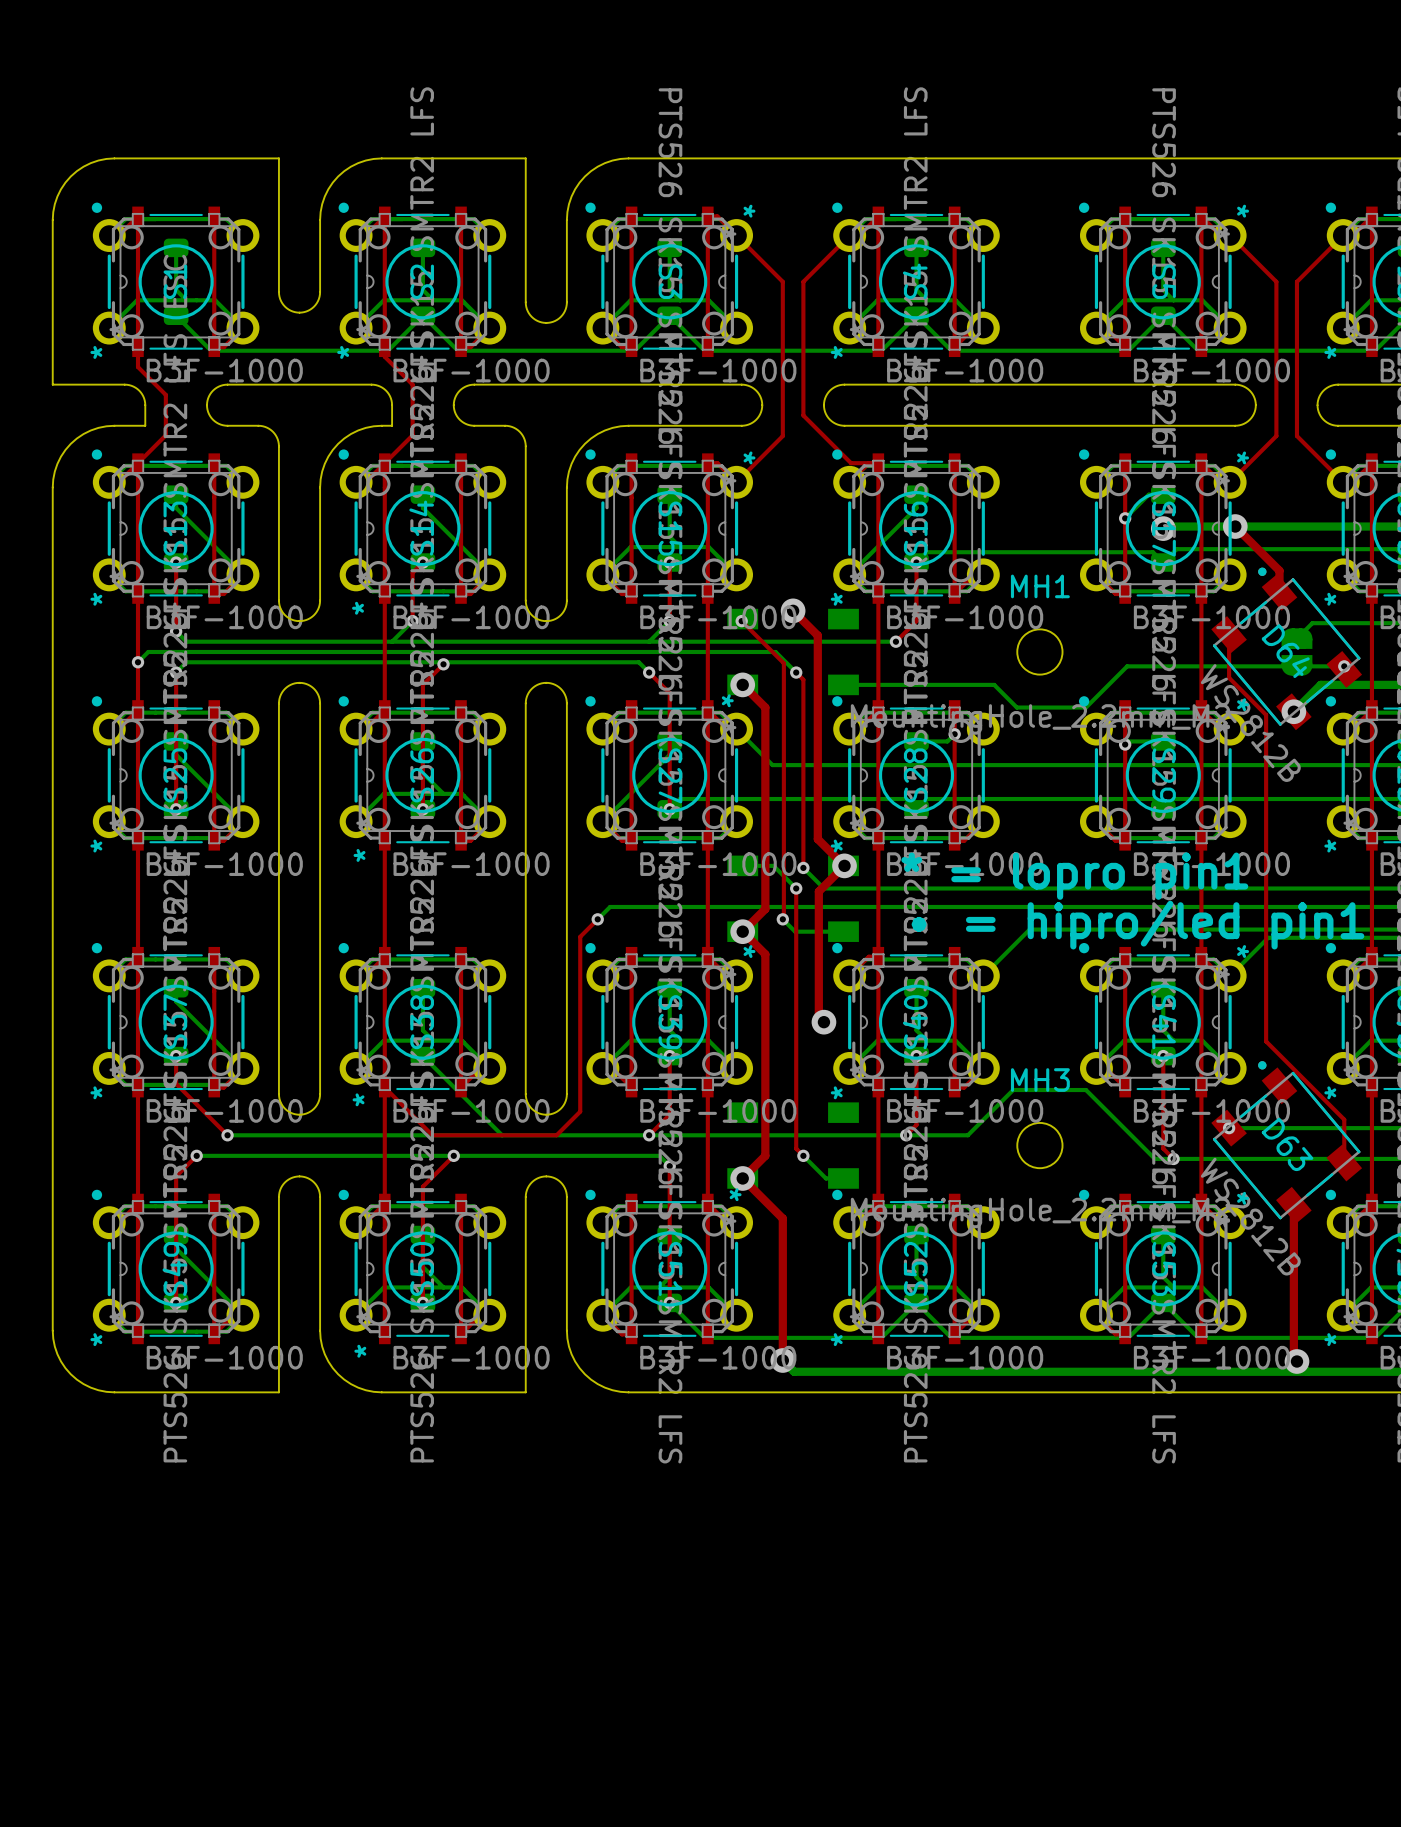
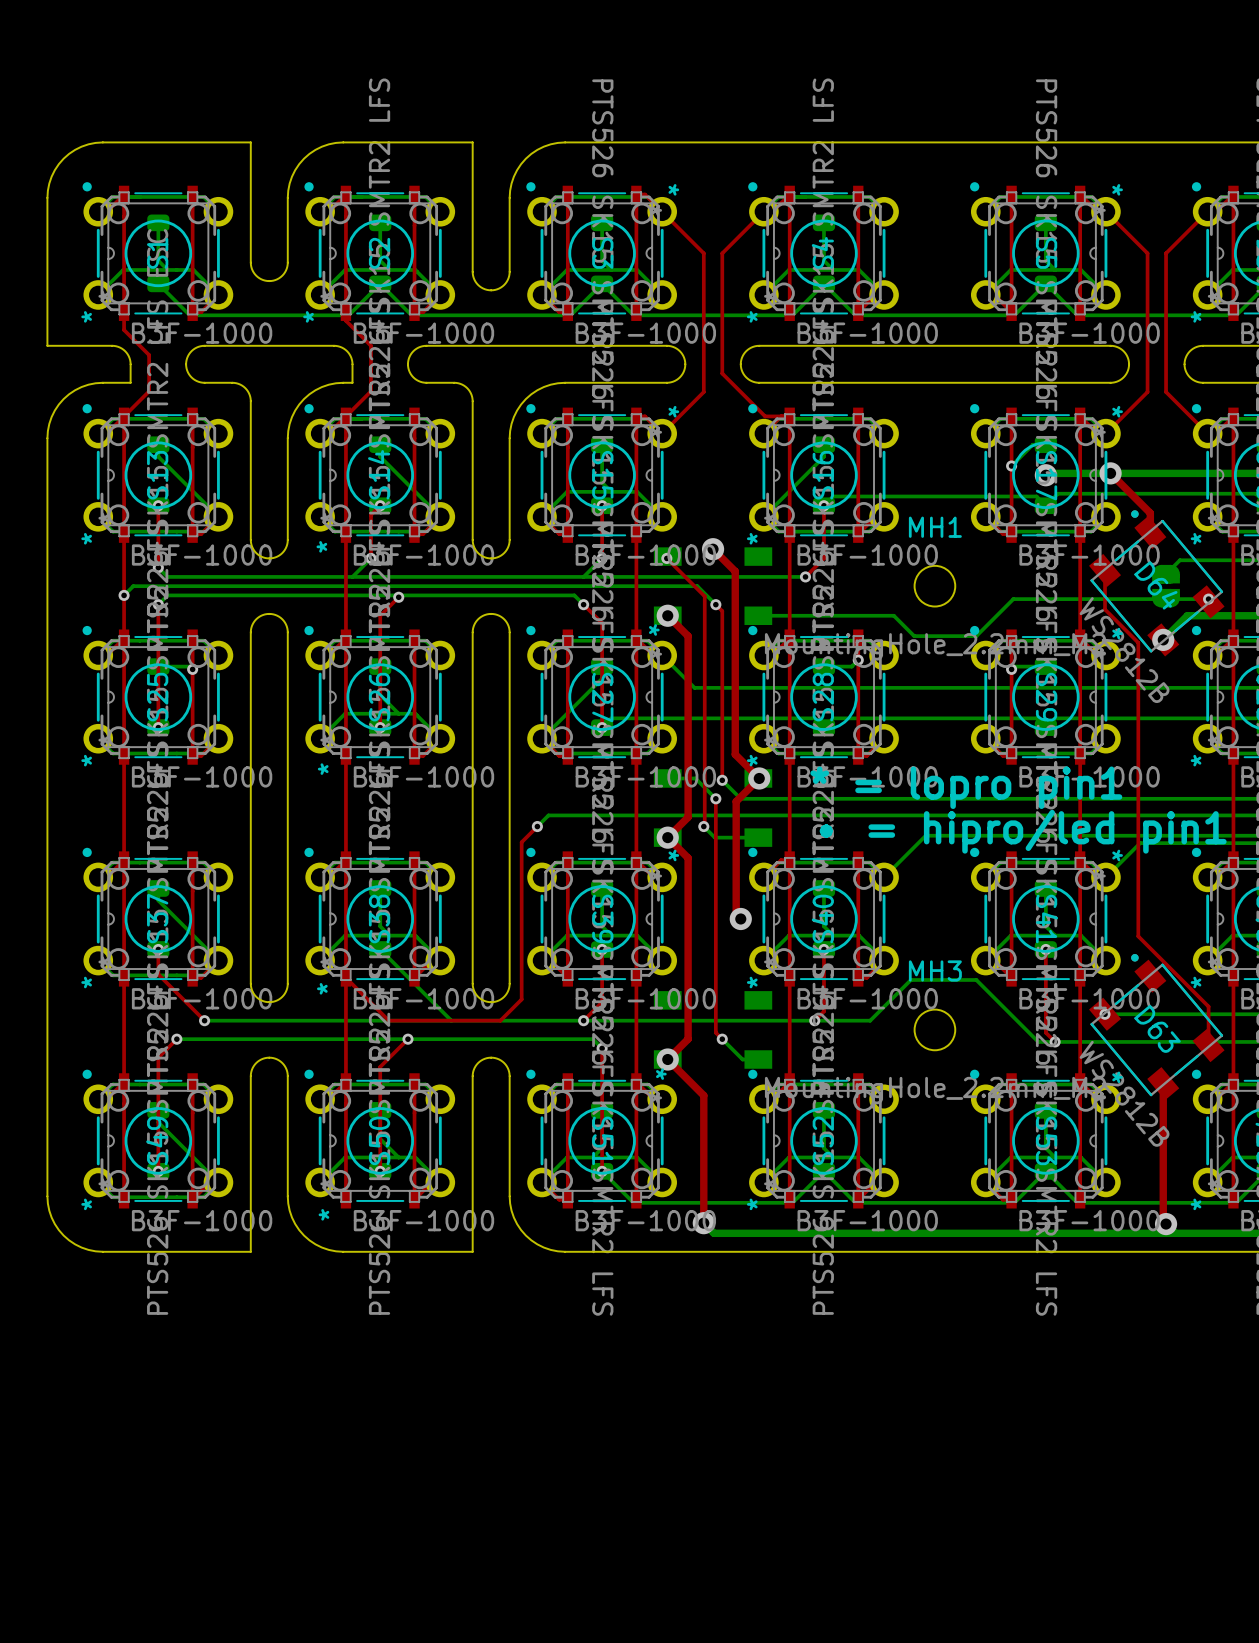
bottom track: (176, 741) (176, 754) (242, 821) -> (158, 666) (189, 666) (192, 669)
via: none -> (192, 669)

